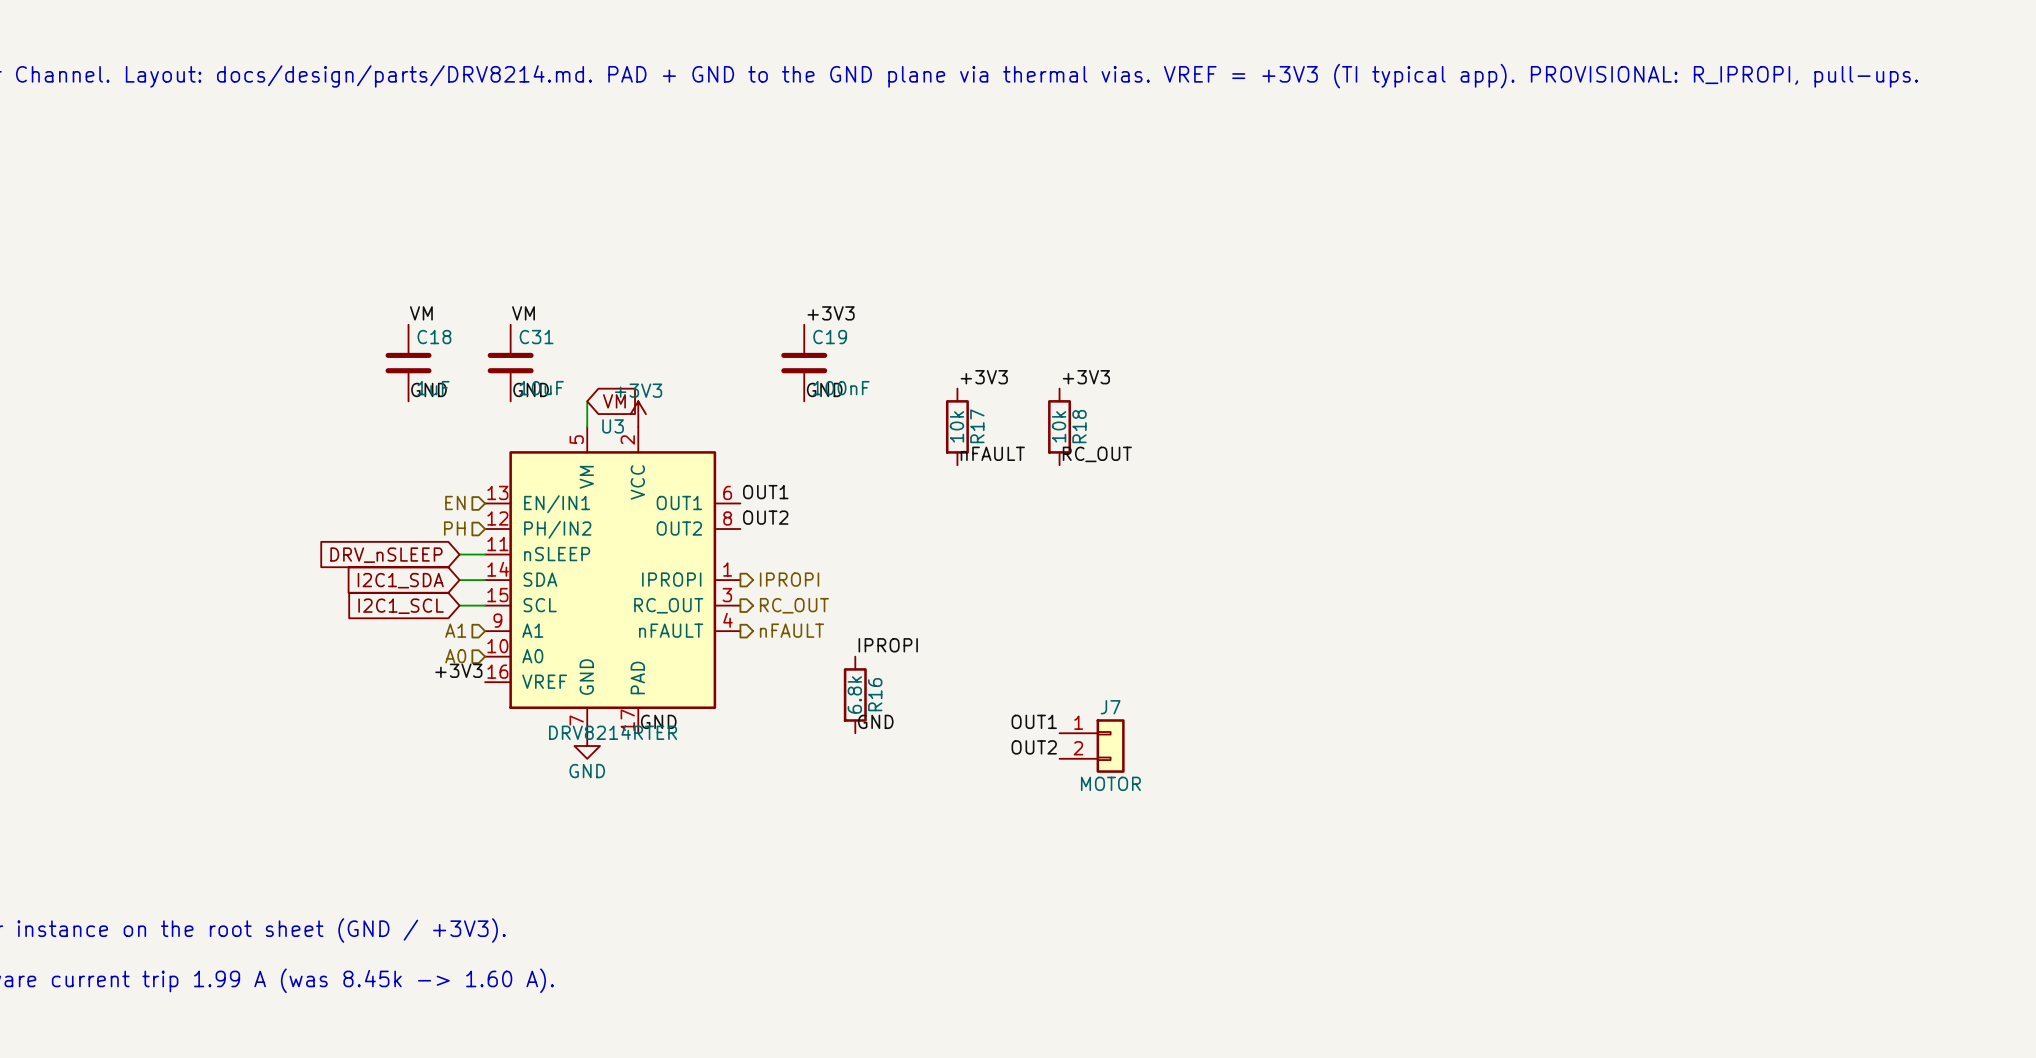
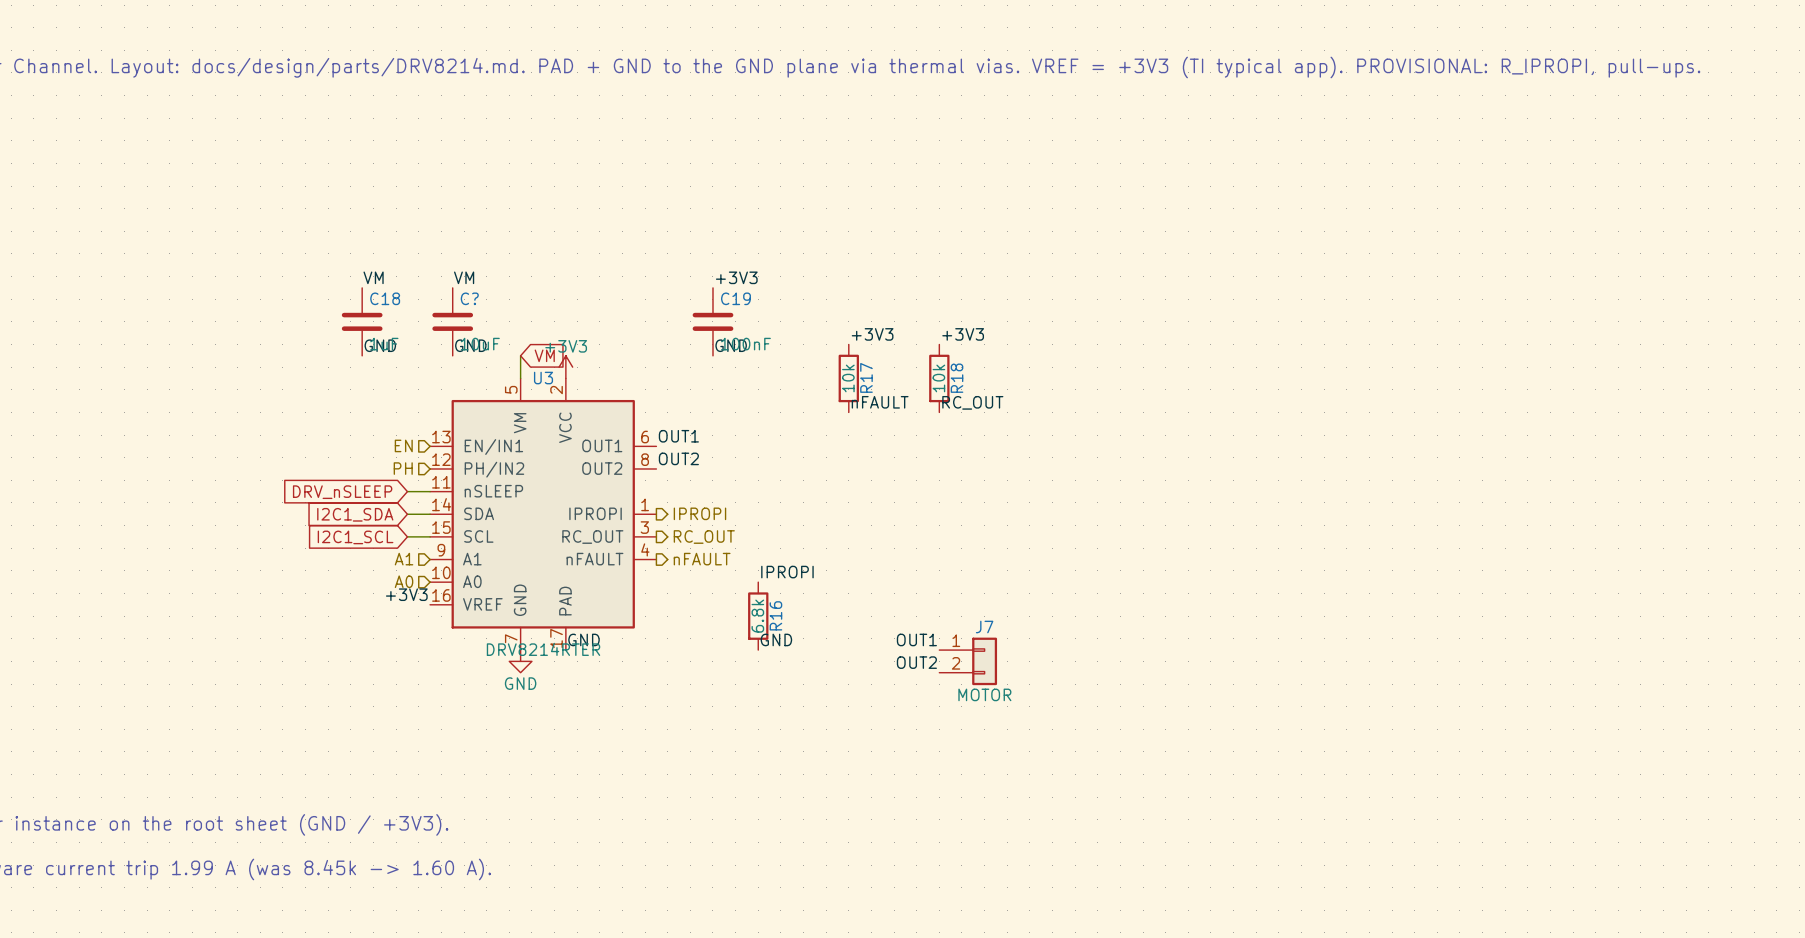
C31 name: C31 (536, 337) -> C? (469, 298)

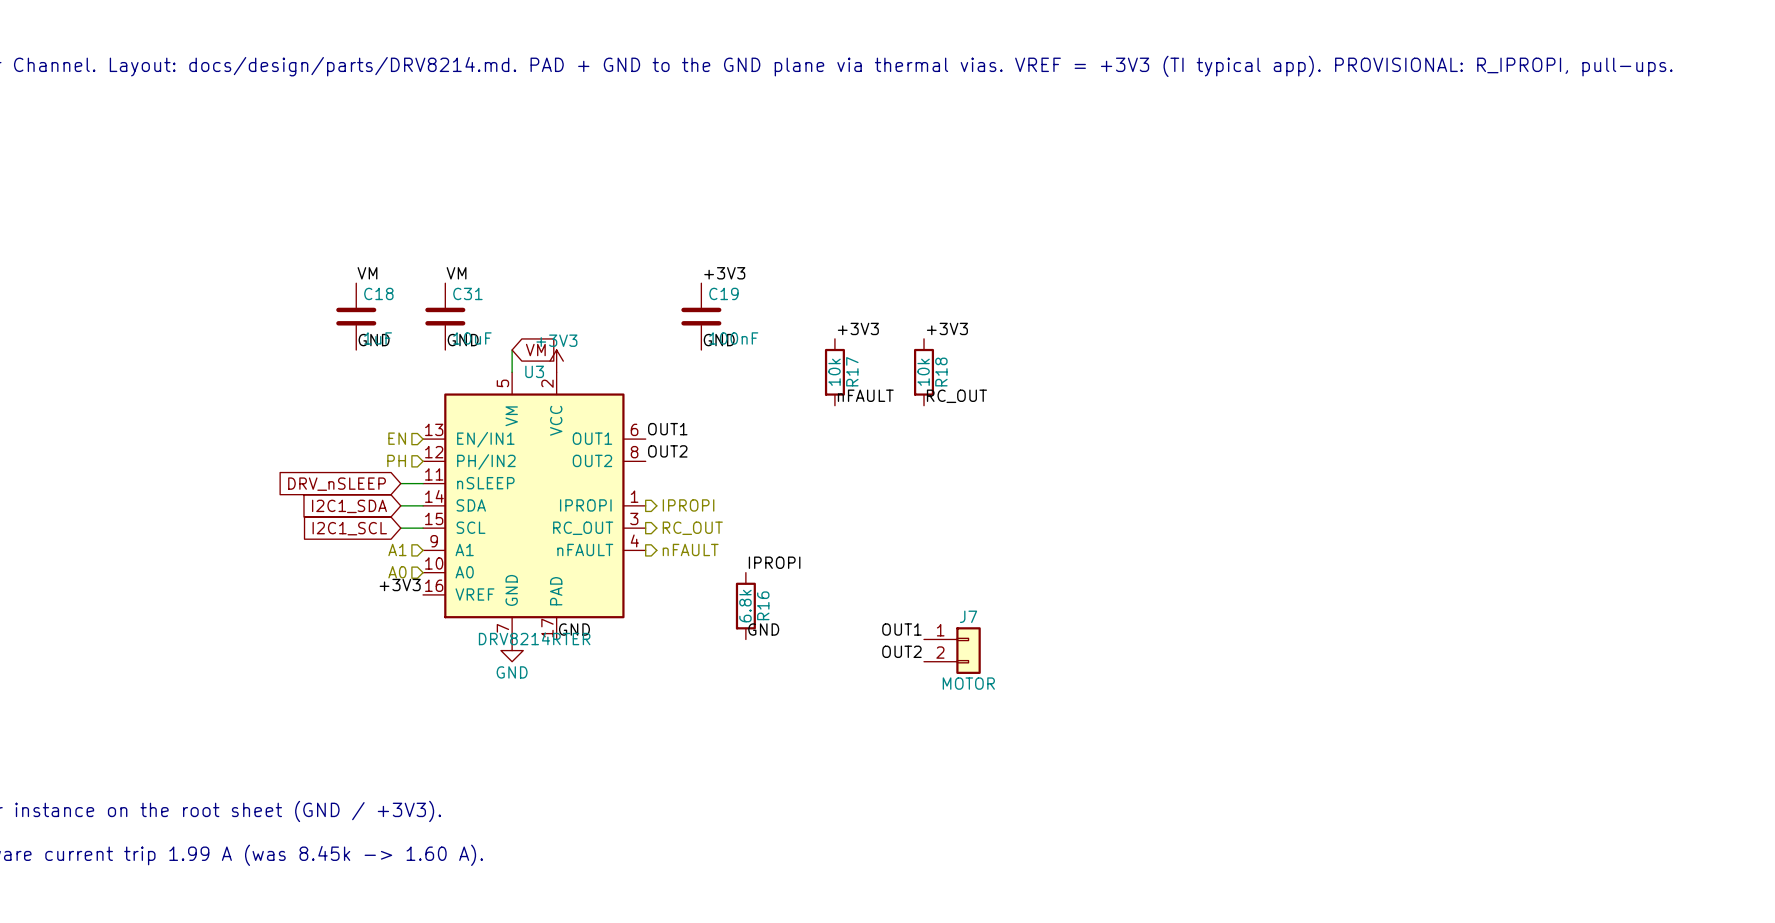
C? name: C? (469, 298) -> C31 (467, 293)

